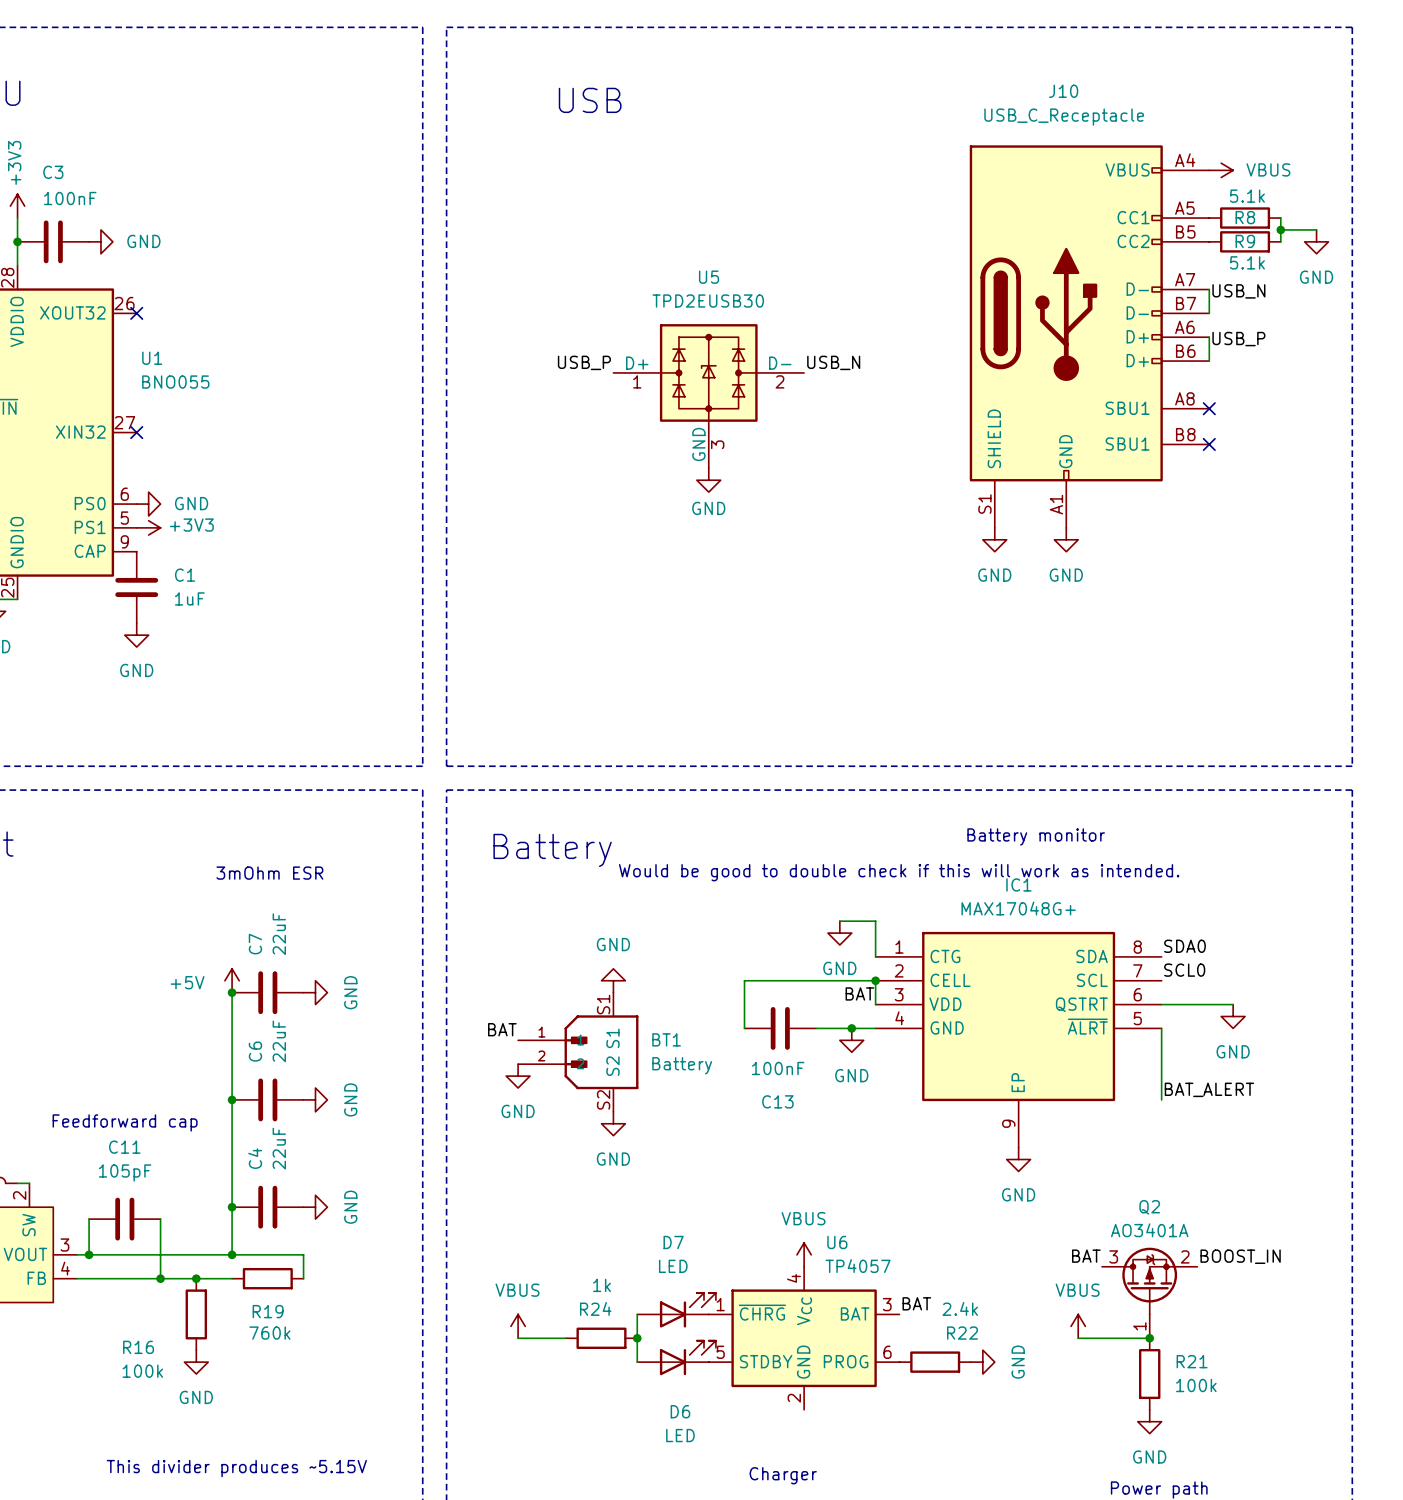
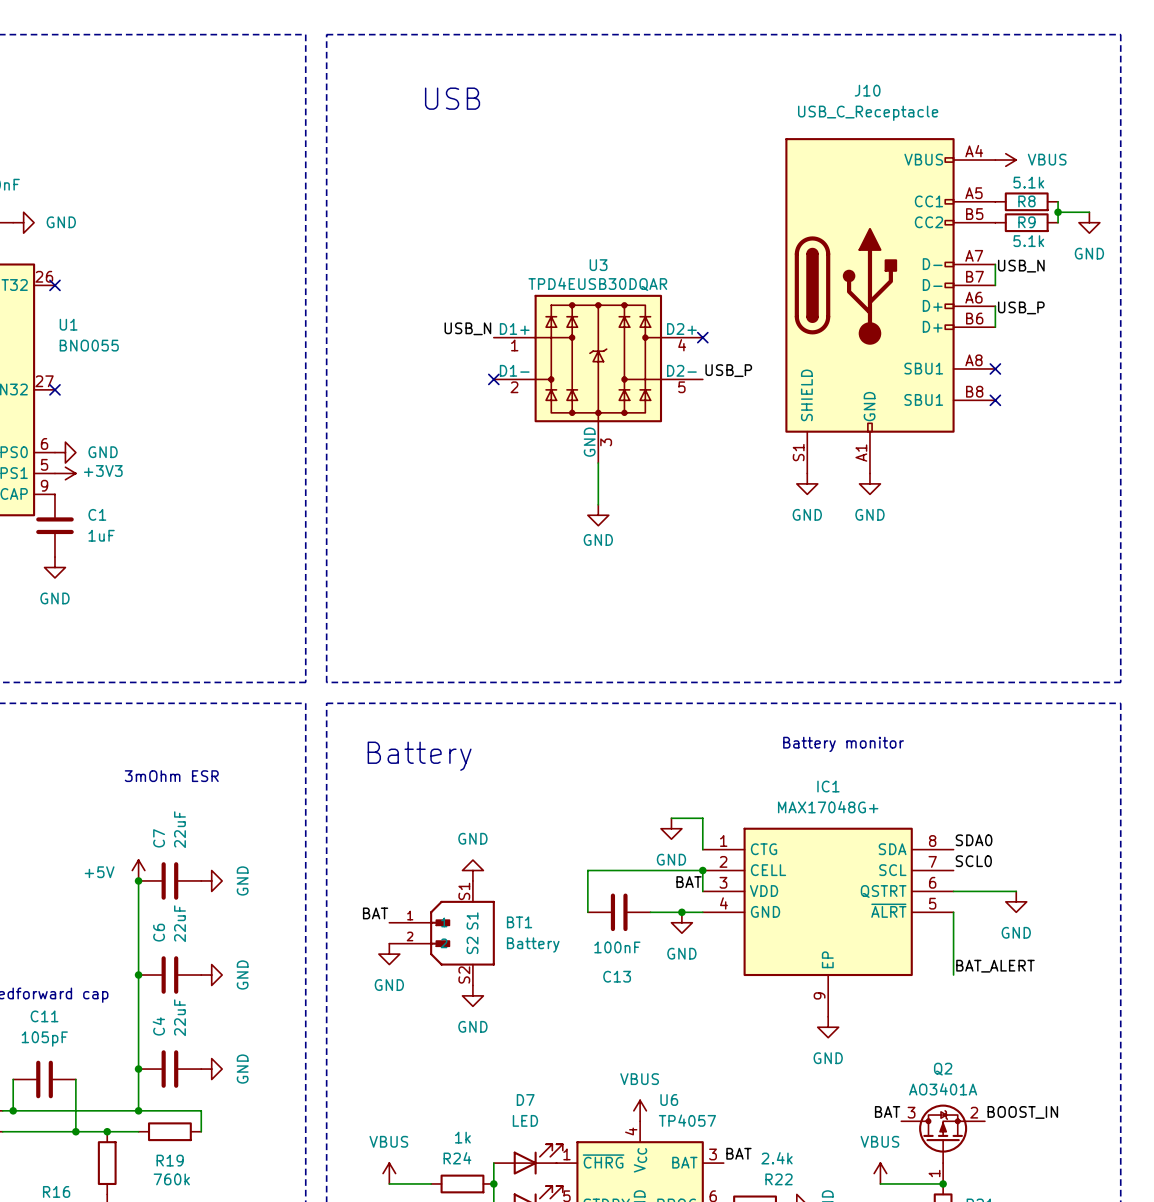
label: USB_P (584, 362) -> none
label position: USB_N (833, 362) -> USB_N (467, 328)
no-connect mark: none -> (702, 337)
U5: TPD2EUSB30 (708, 396) -> none
label: none -> USB_P (728, 370)
no-connect mark: none -> (493, 379)
U3: none -> TPD4EUSB30DQAR (598, 378)
power symbol position: GND (708, 480) -> GND (598, 515)
wire: none -> (598, 463) (598, 504)
text: Would be good to double check if this will work as intended. (899, 872) -> none

